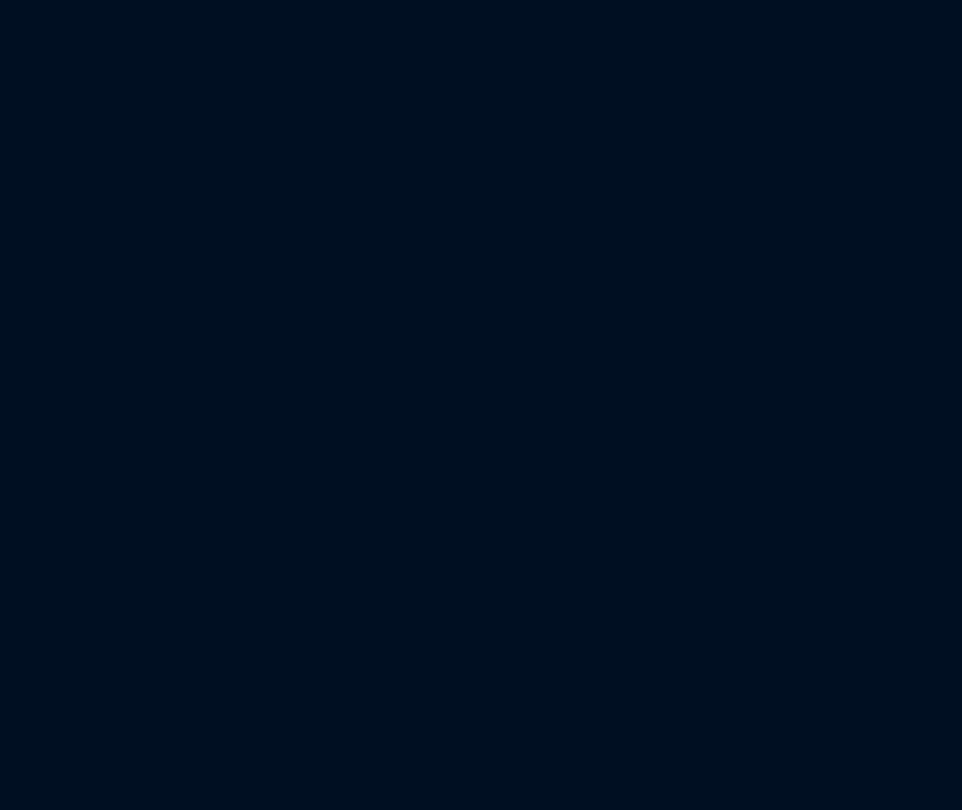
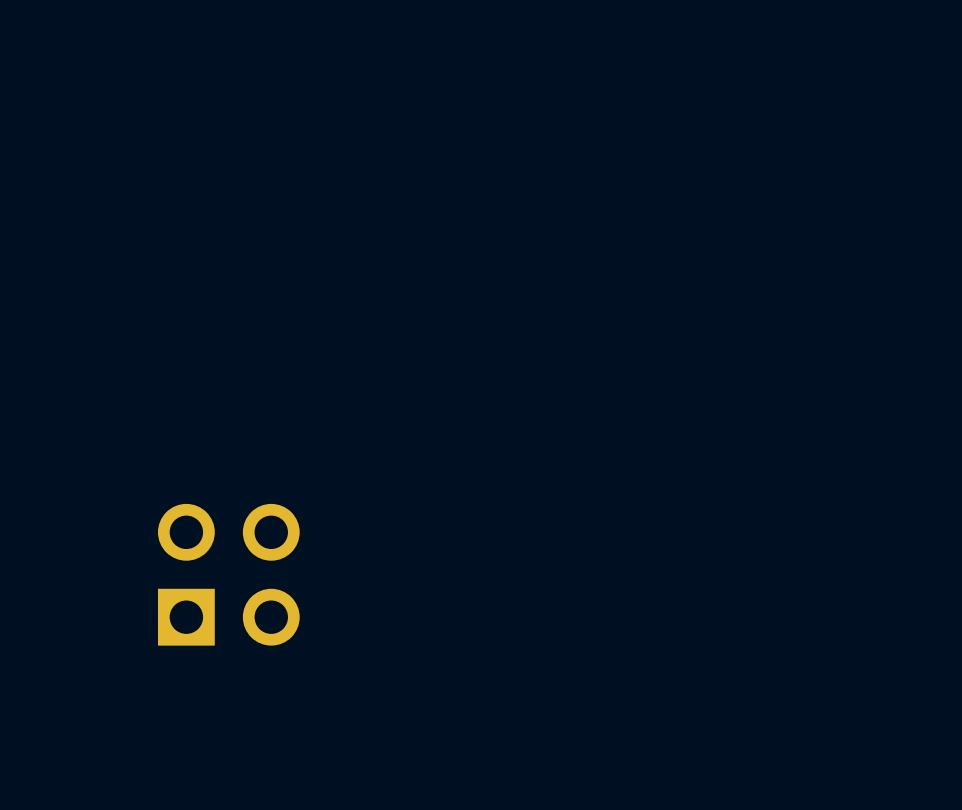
part: none -> (228, 574)

